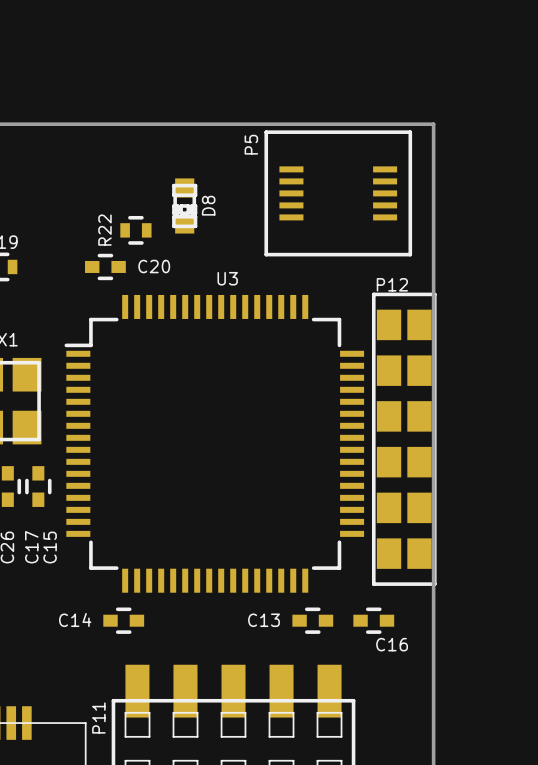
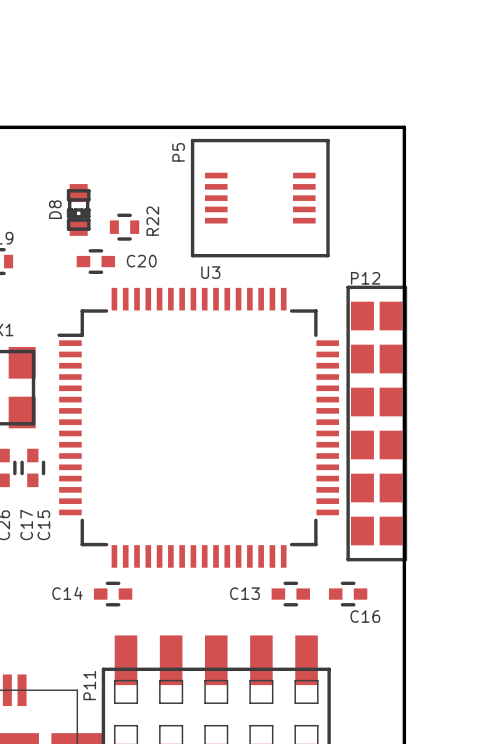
P5 position: (338, 193) -> (260, 198)
D8 position: (184, 205) -> (78, 209)
D8 name position: D8 (208, 205) -> D8 (55, 209)
R22 name position: R22 (104, 230) -> R22 (152, 221)

